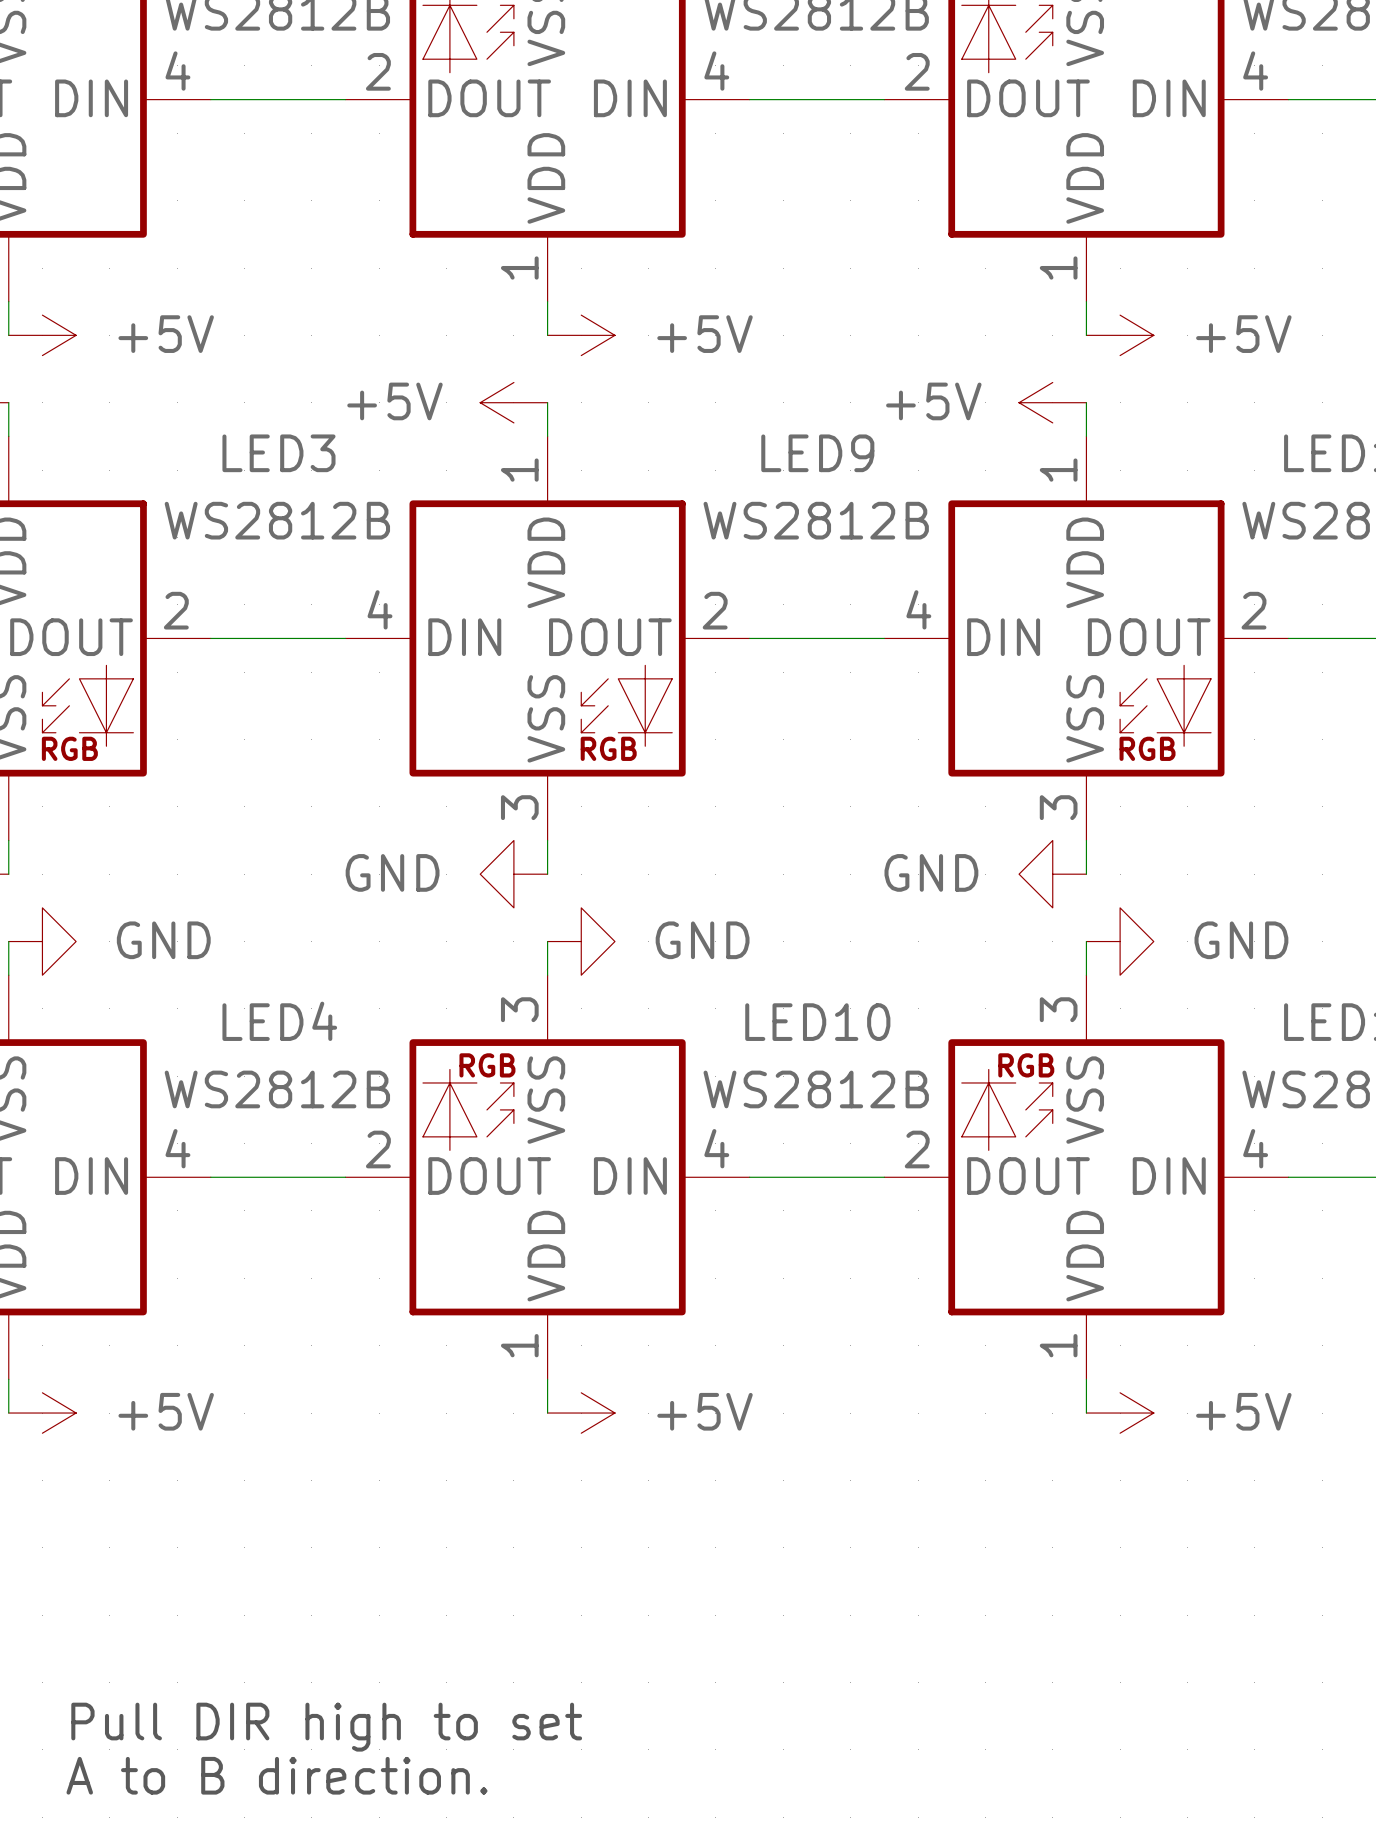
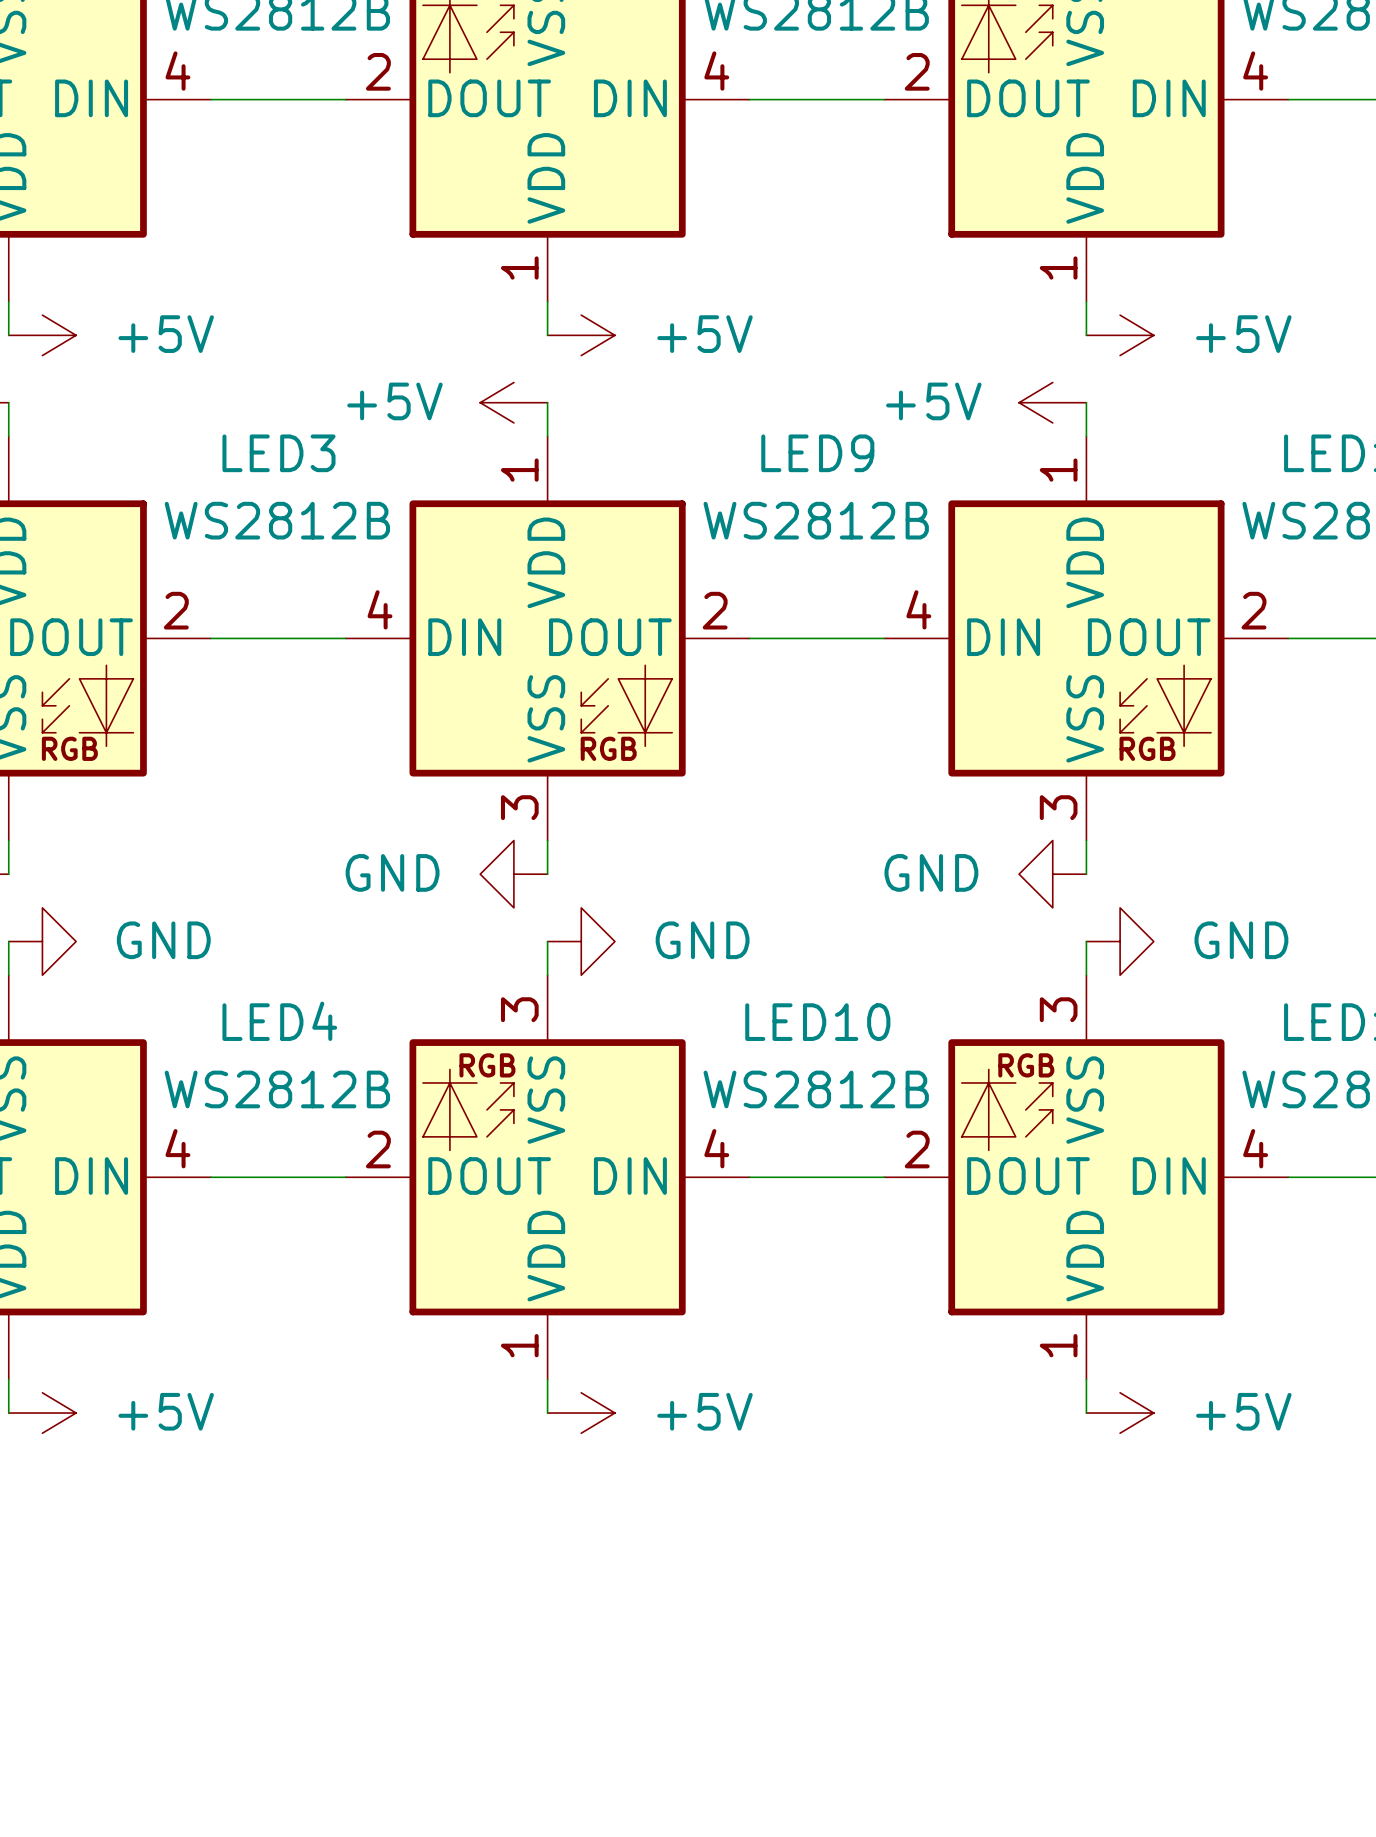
text: Pull DIR high to set (326, 1727) -> none
text: A to B direction. (276, 1775) -> none

